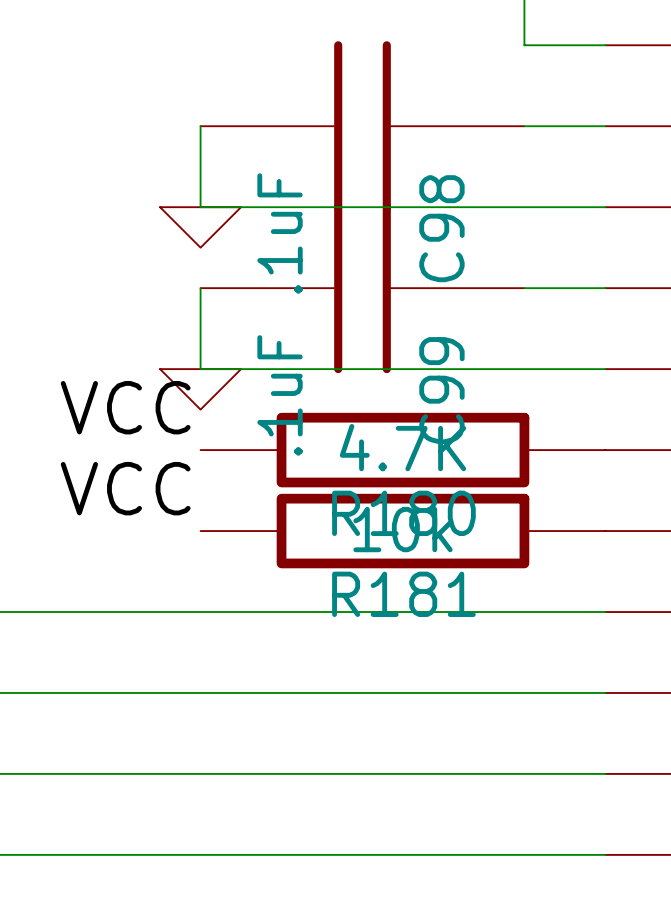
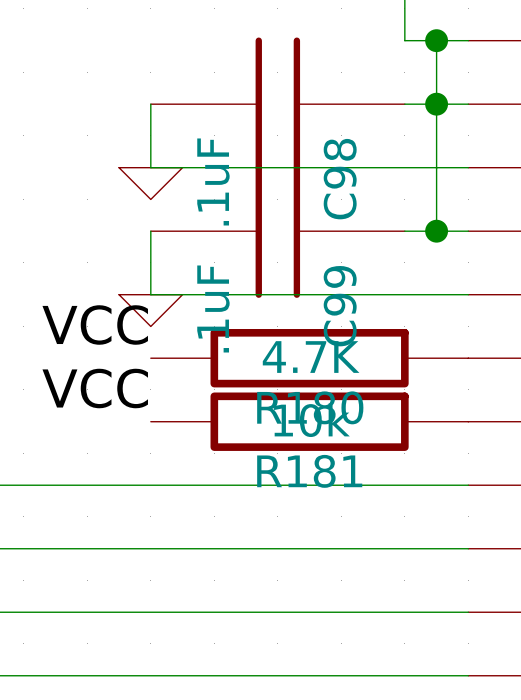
wire: none -> (436, 40) (436, 231)
junction: none -> (436, 40)
junction: none -> (436, 104)
junction: none -> (436, 231)

